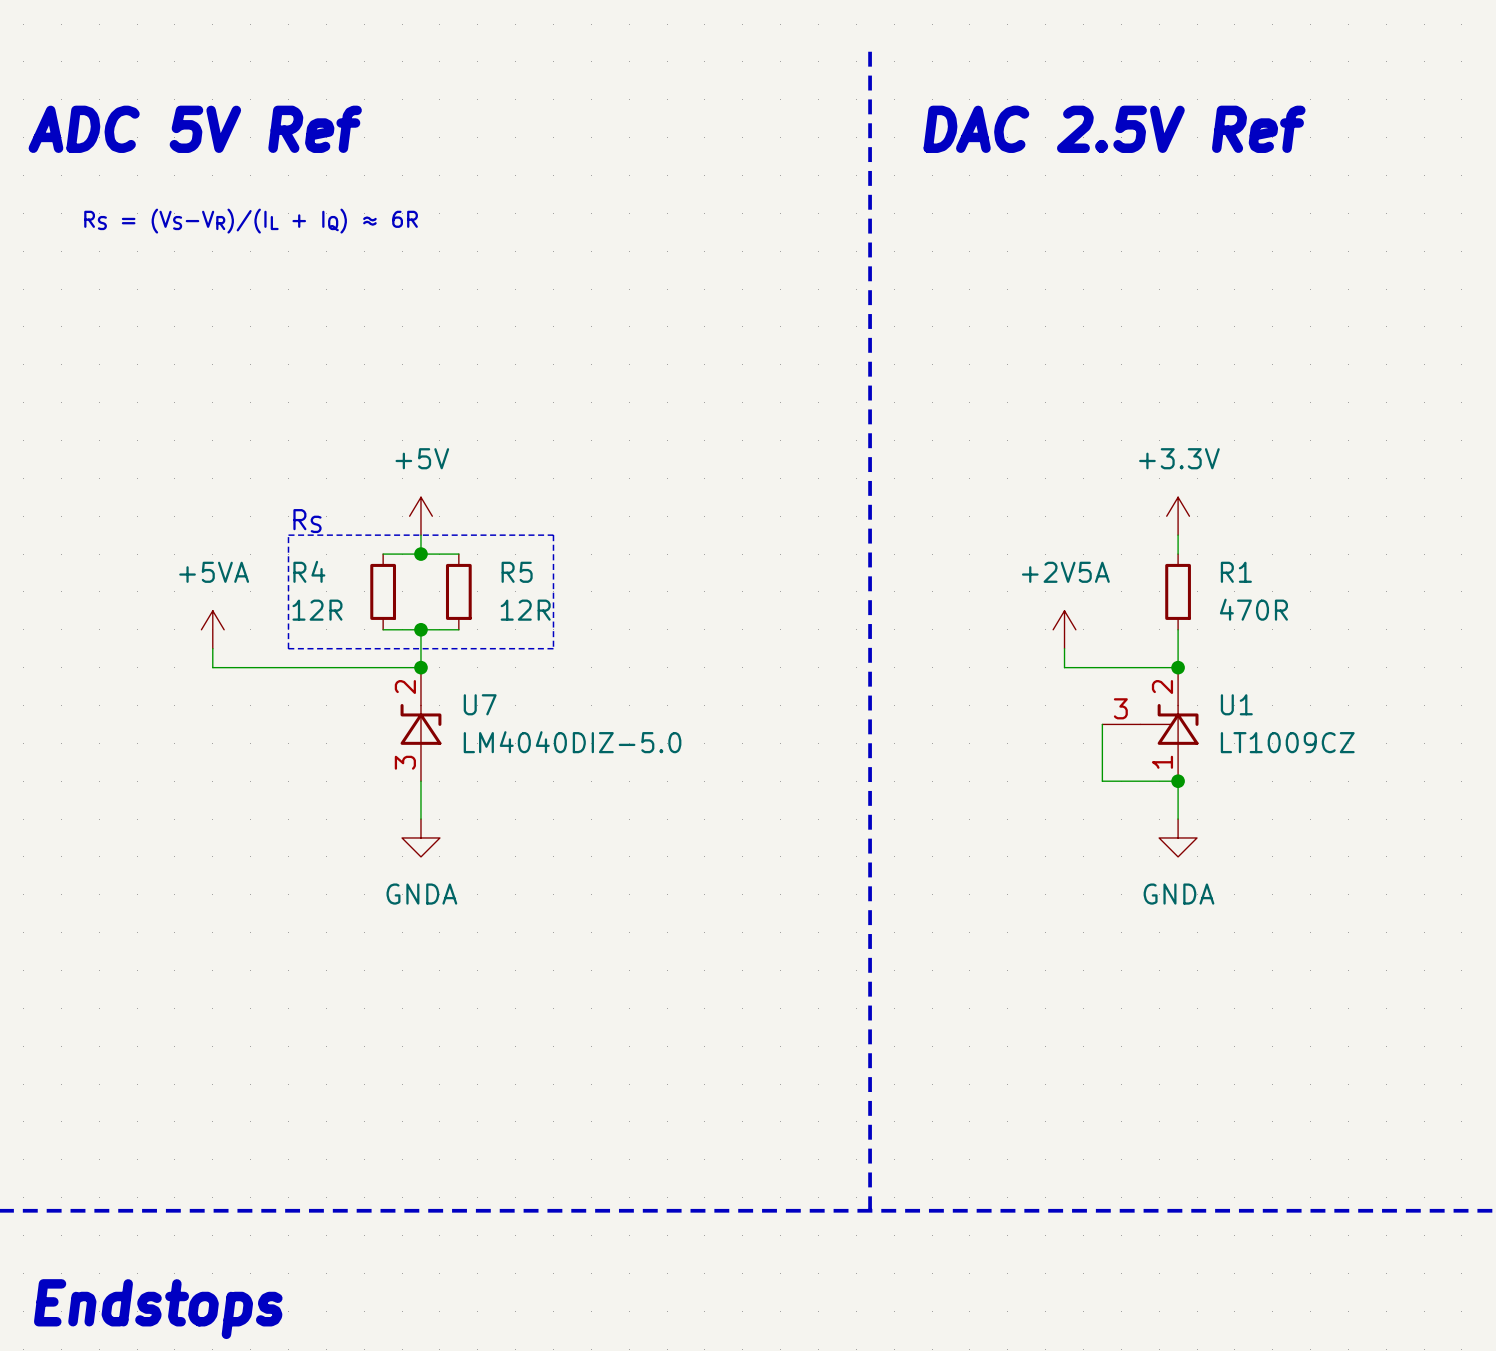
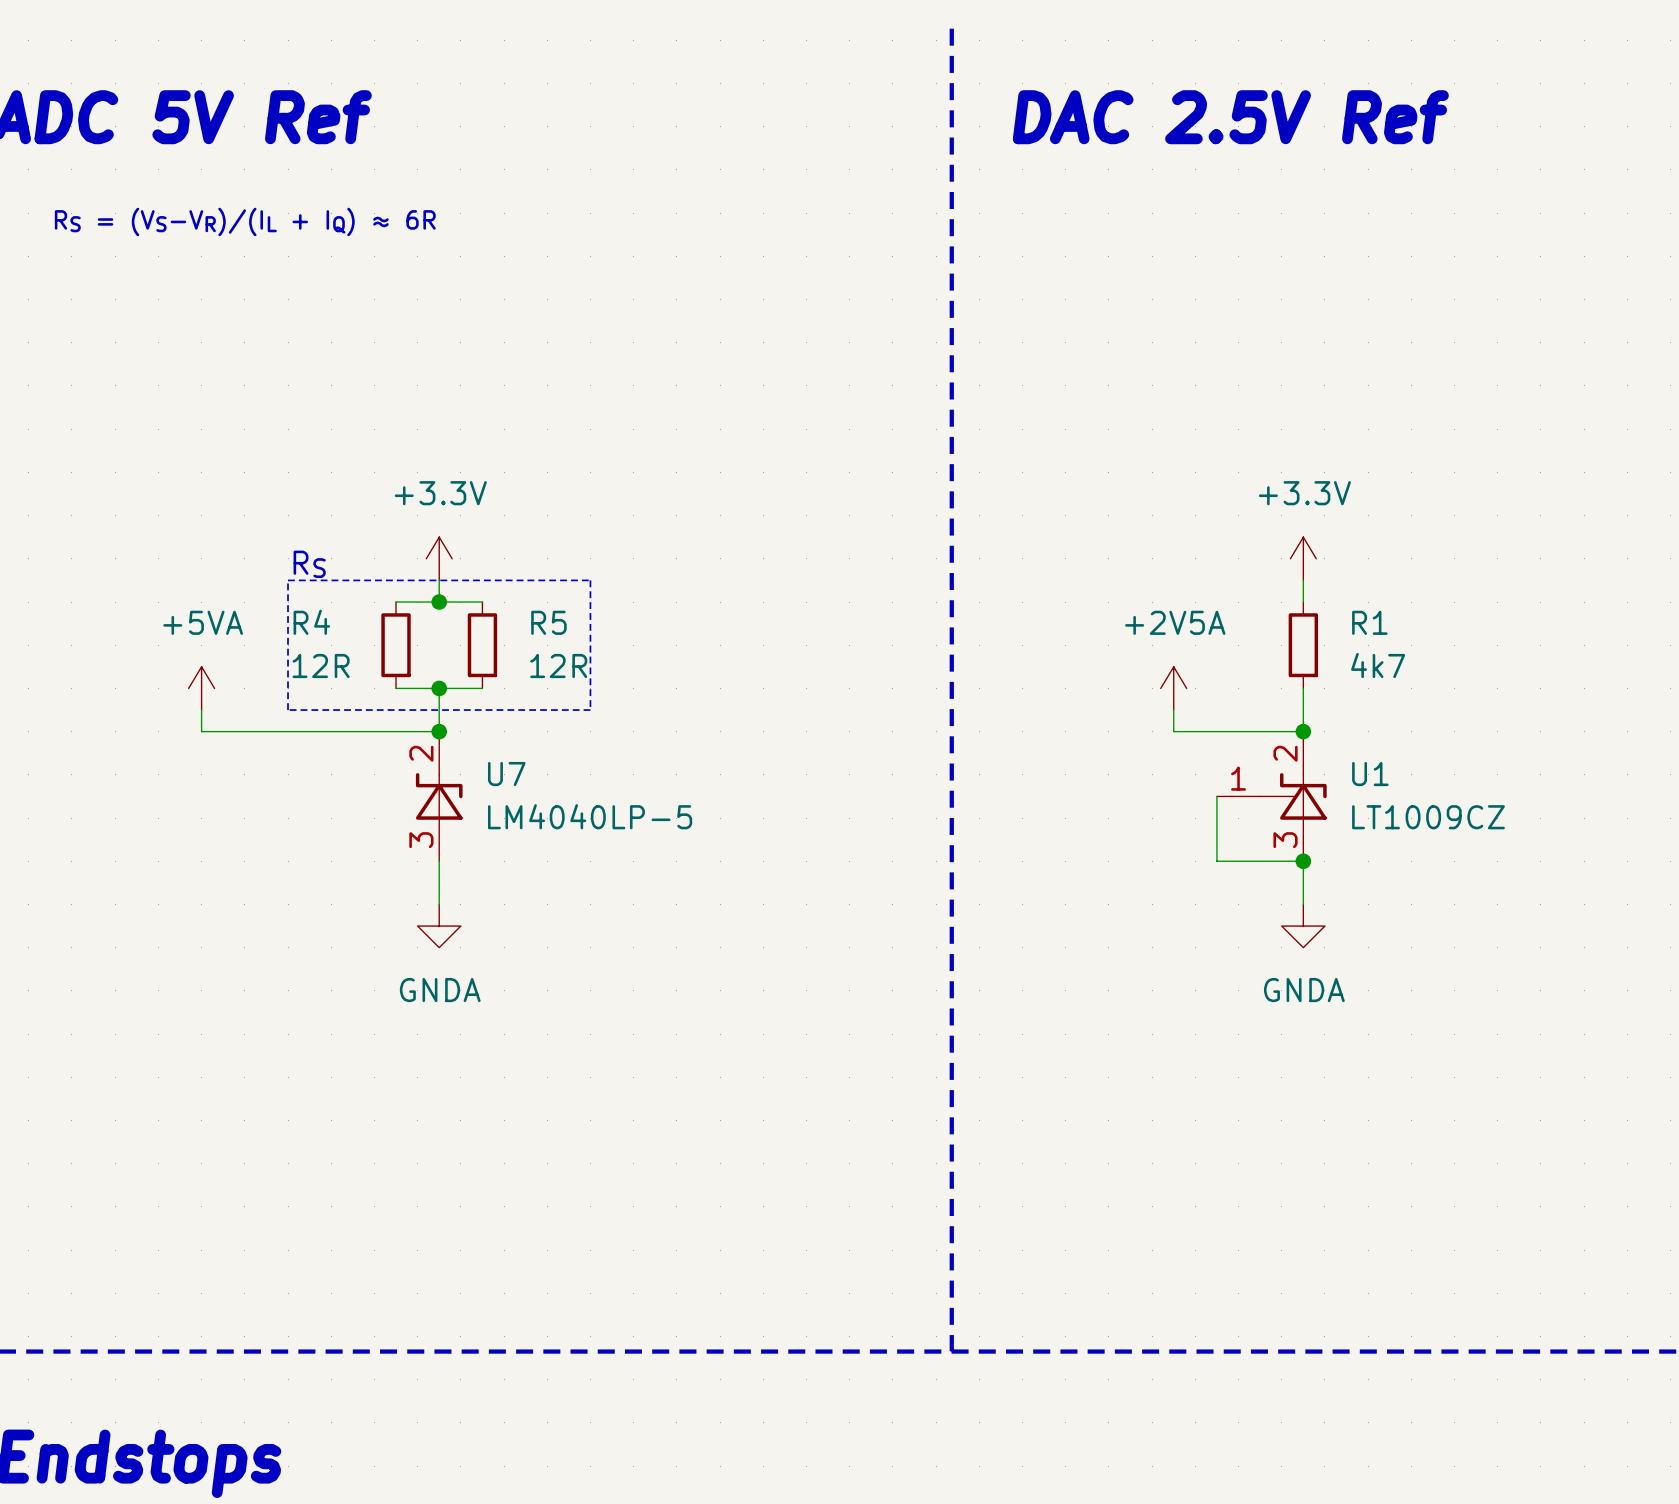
power symbol: +5V (420, 516) -> +3.3V (439, 558)
R1 value: 470R (1253, 609) -> 4k7 (1378, 665)
U1 pin number: 3 (1120, 708) -> 1 (1238, 778)
U7 value: LM4040DIZ-5.0 (572, 742) -> LM4040LP-5 (590, 816)
U1 pin number: 1 (1162, 762) -> 3 (1285, 840)

